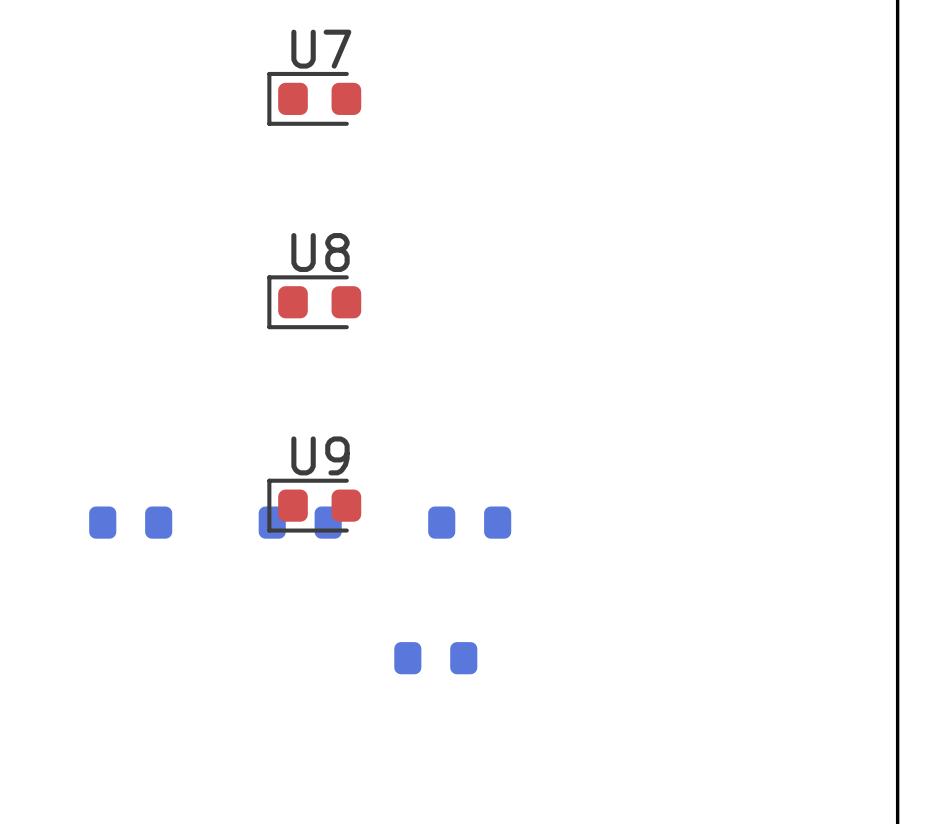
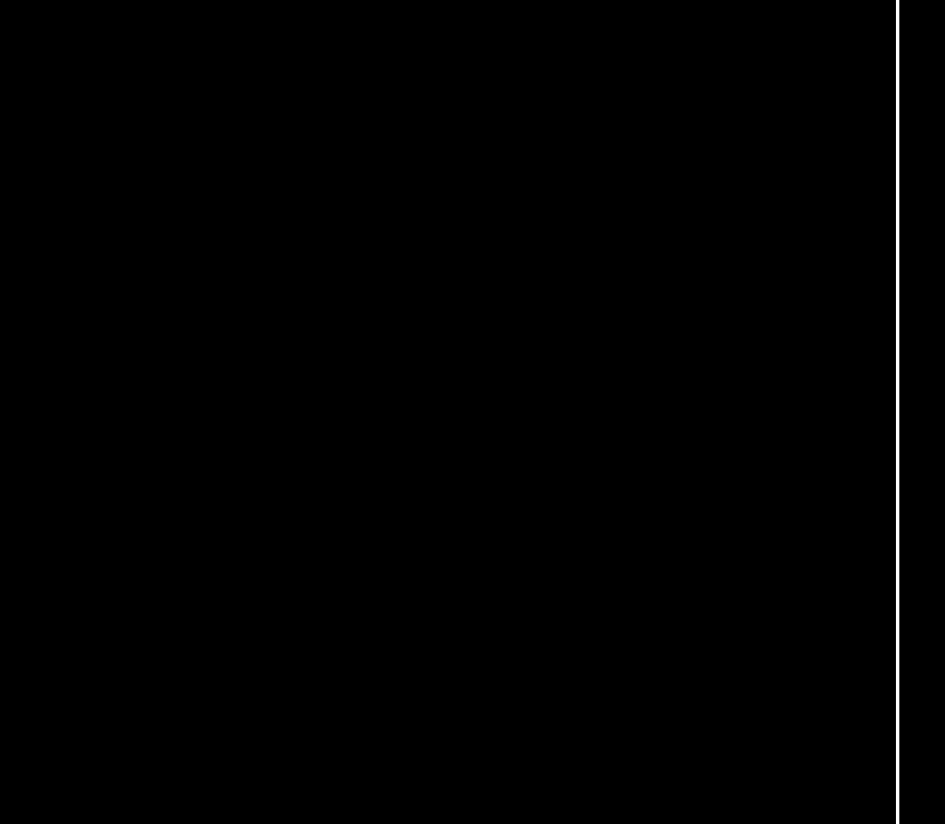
U7: (314, 98) -> none
U8: (314, 302) -> none
U9: (314, 505) -> none
part: (130, 522) -> none
part: (300, 522) -> none
part: (469, 522) -> none
part: (435, 658) -> none

